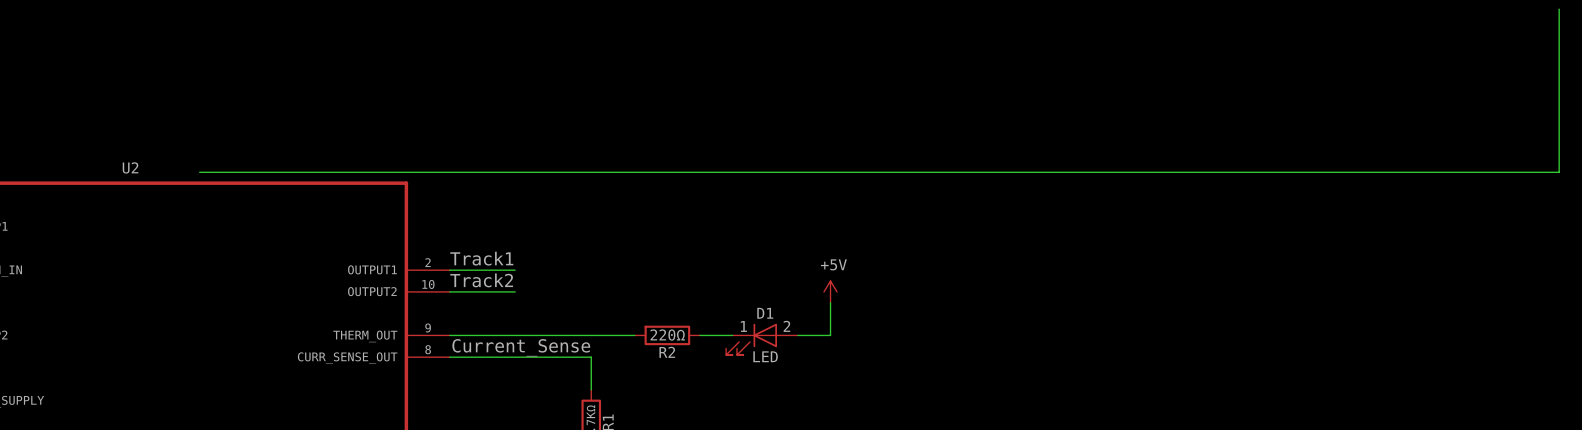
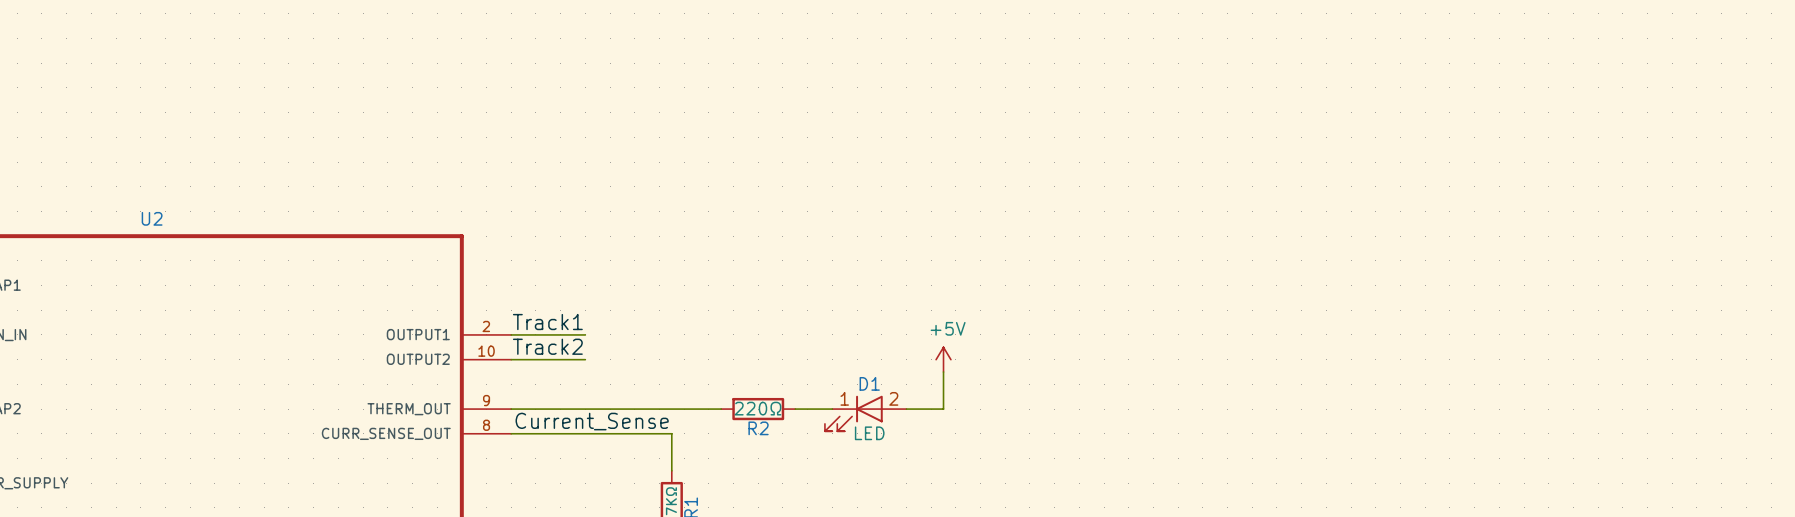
wire: (1559, 9) (1559, 172) (199, 172) -> none

